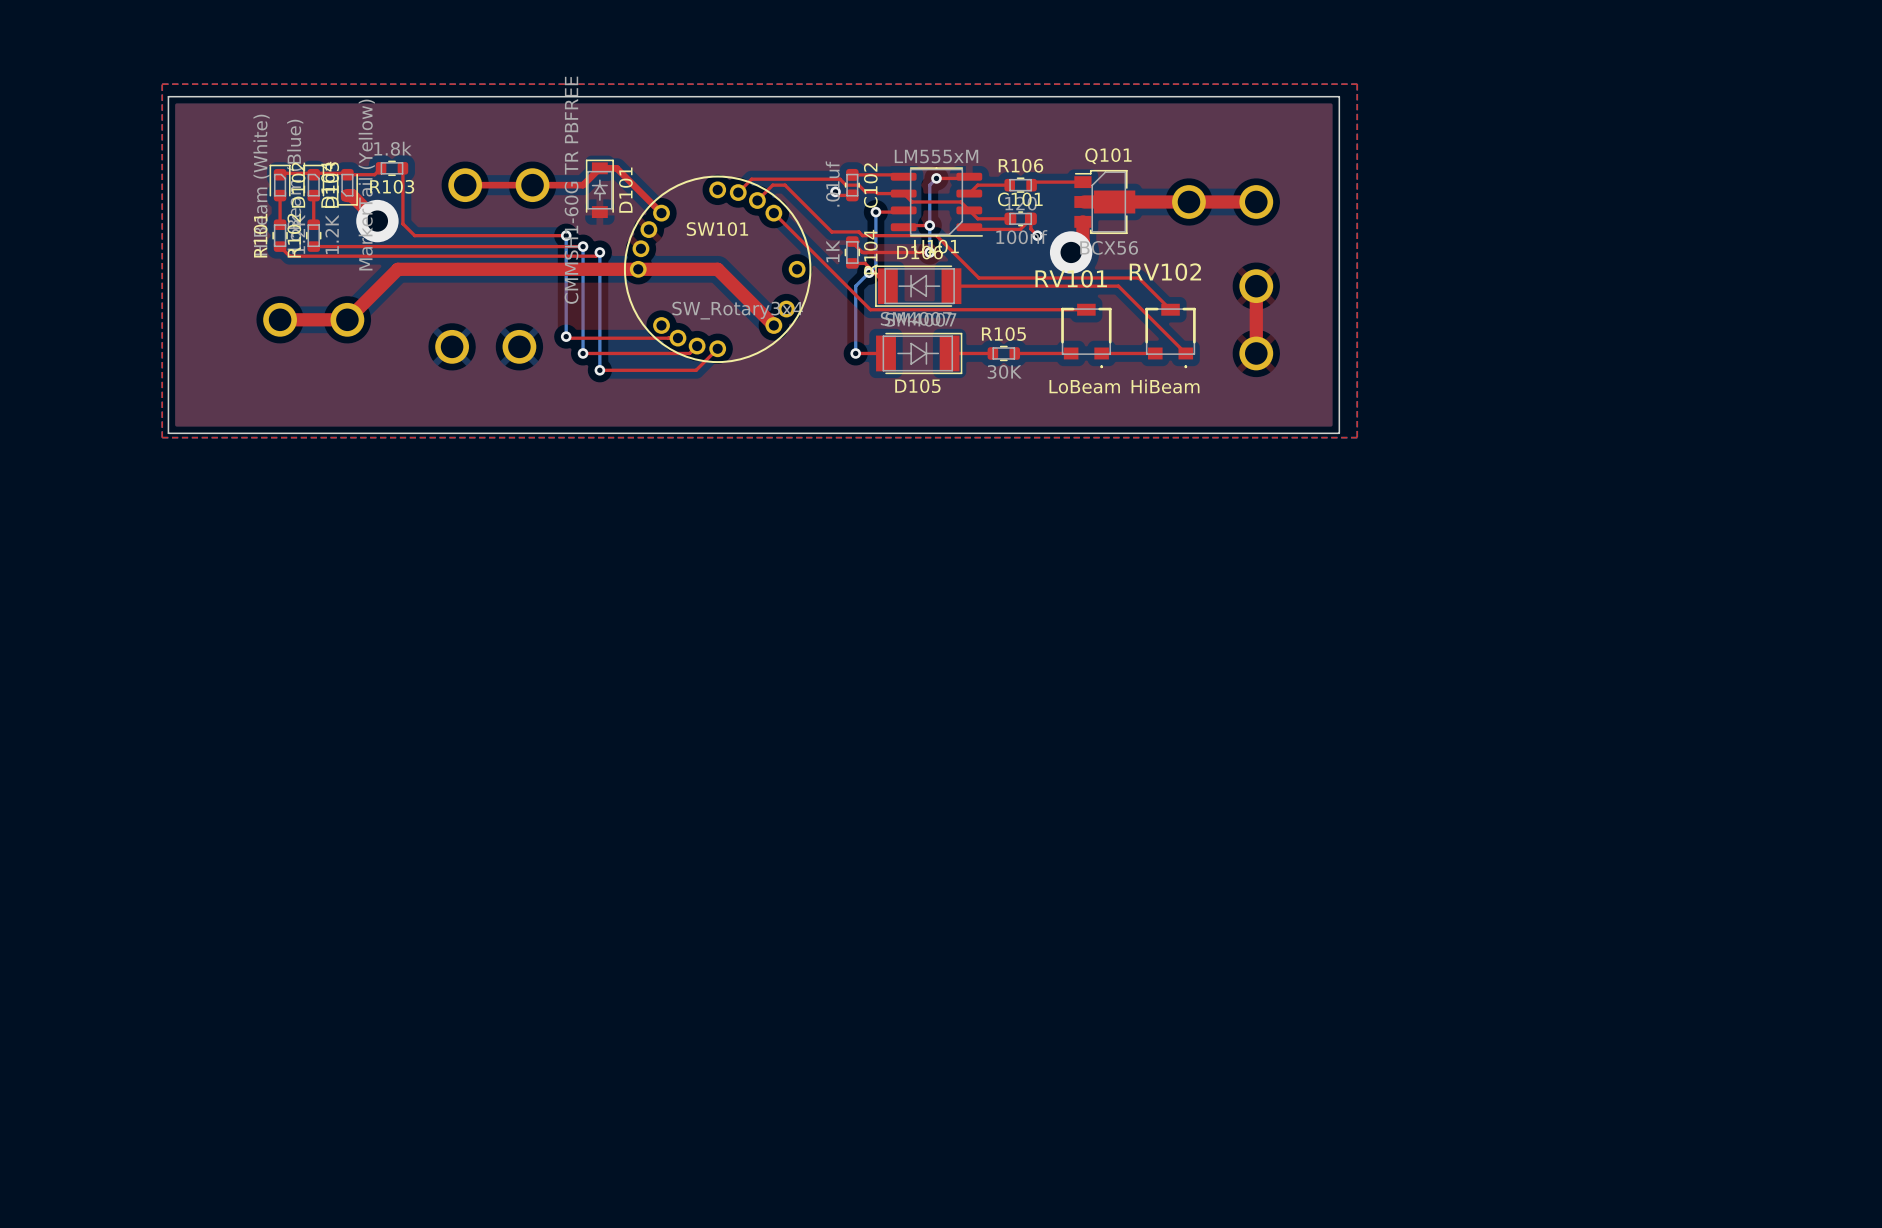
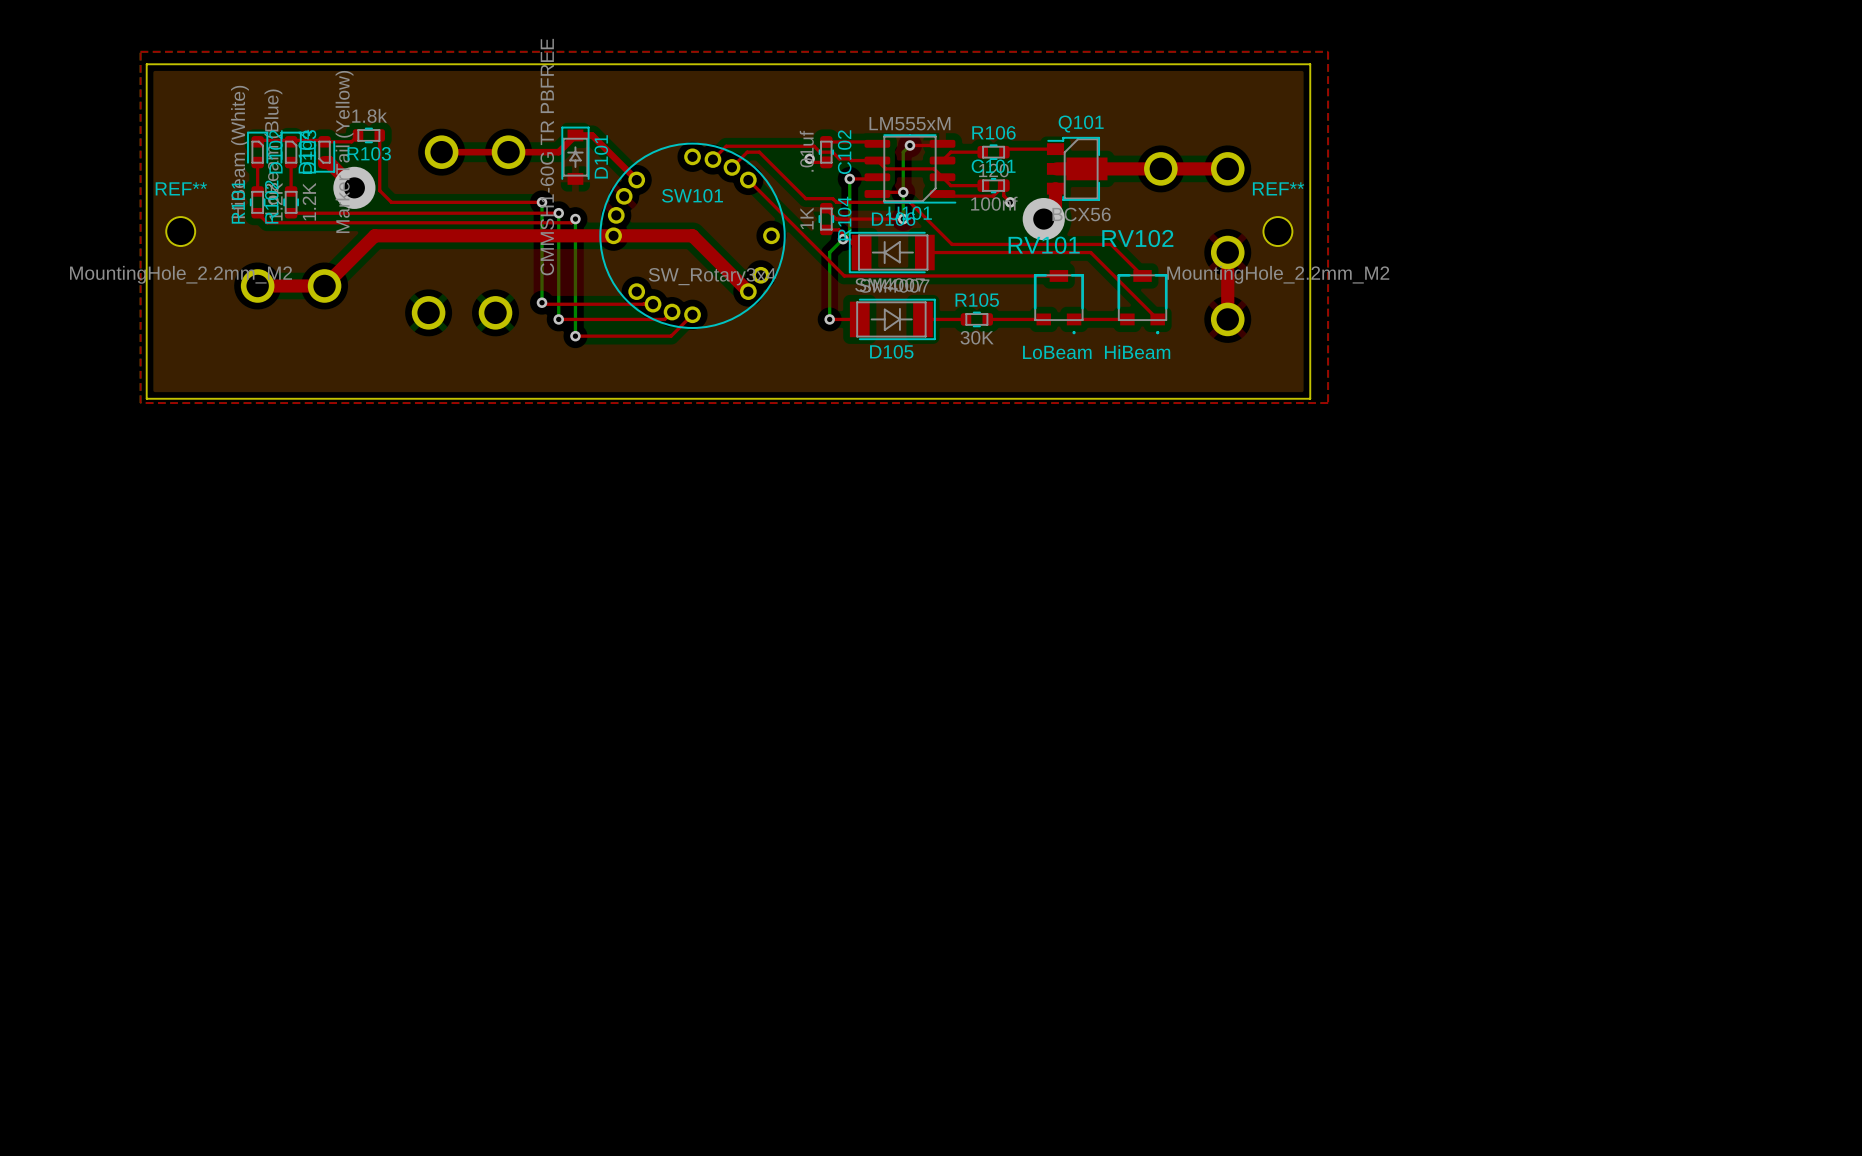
REF**: none -> MountingHole_2.2mm_M2 (180, 231)
REF**: none -> MountingHole_2.2mm_M2 (1277, 231)

